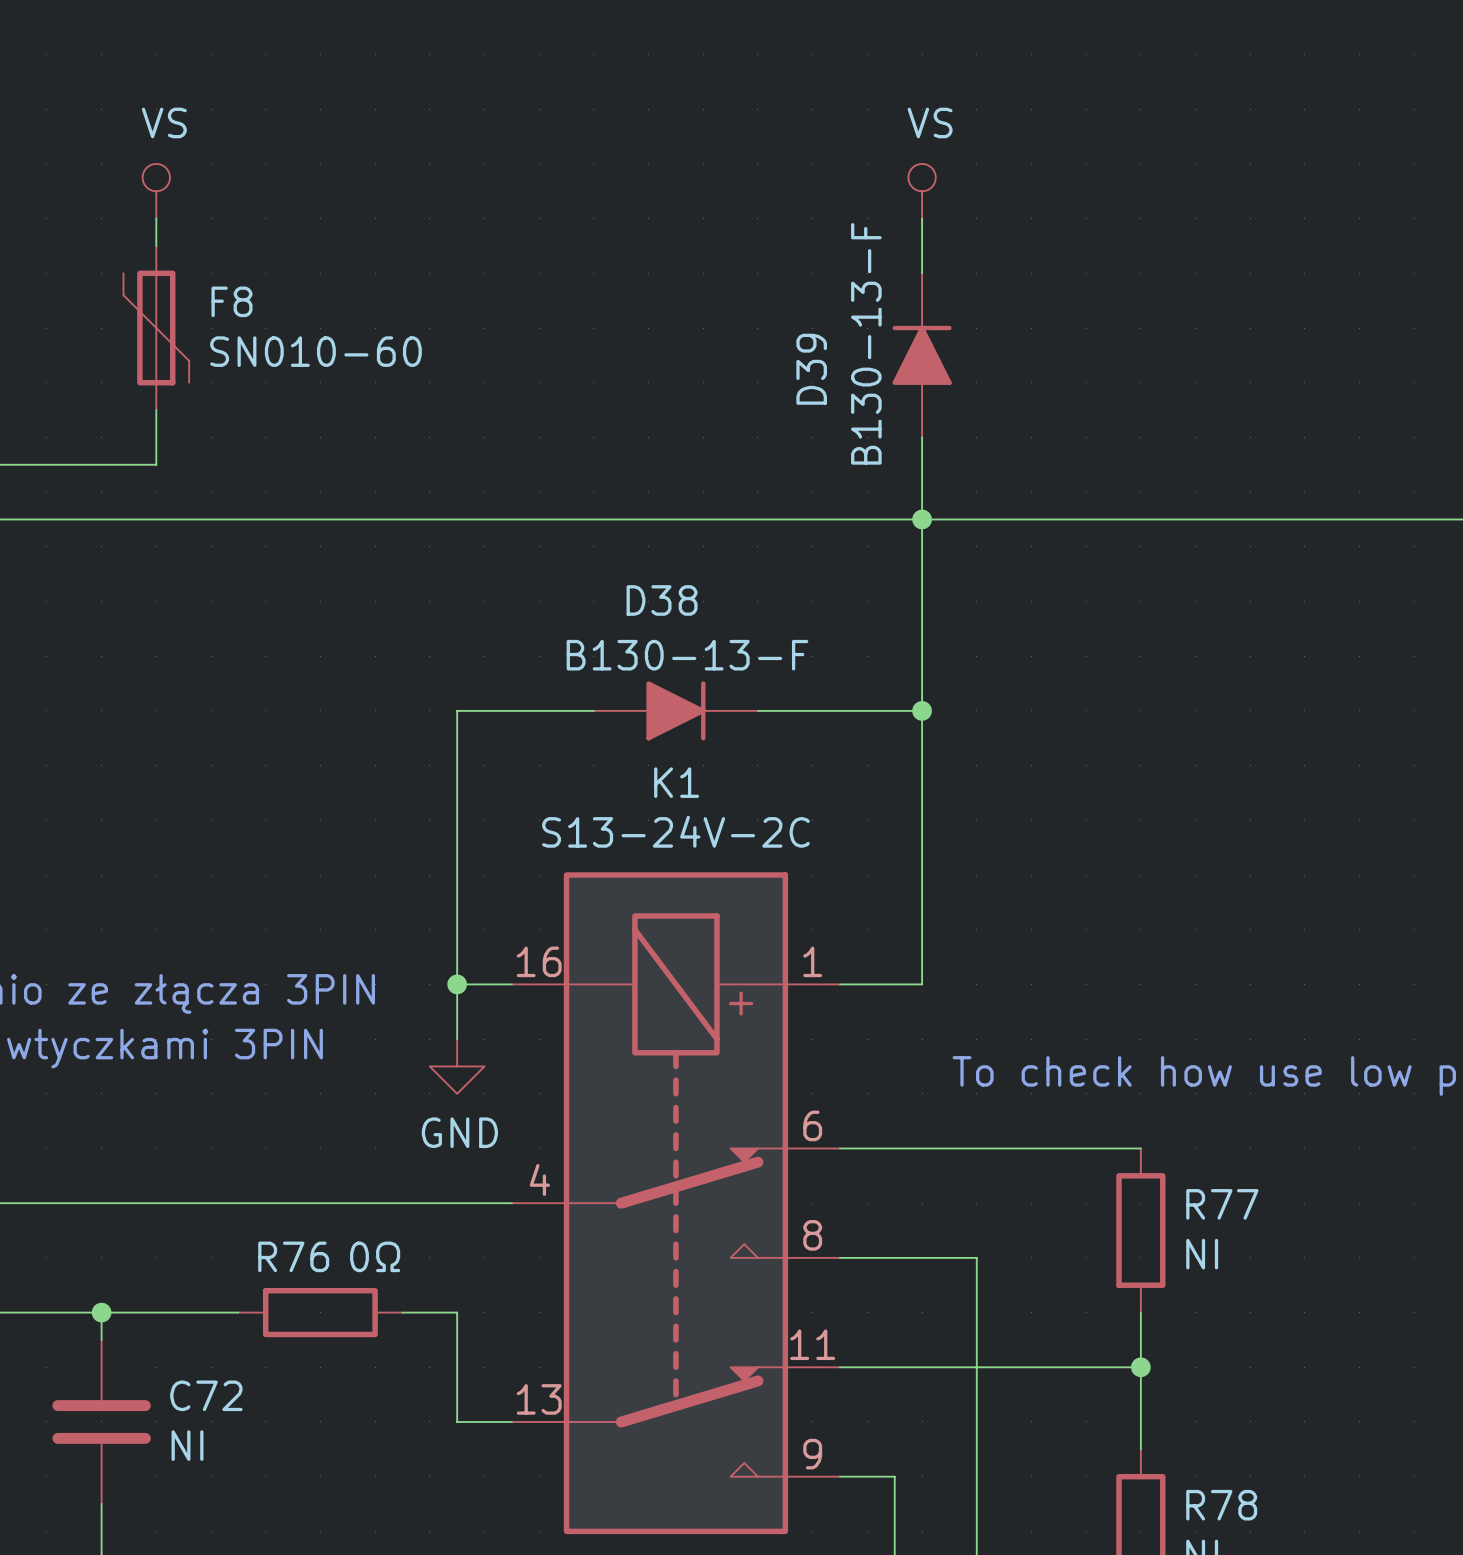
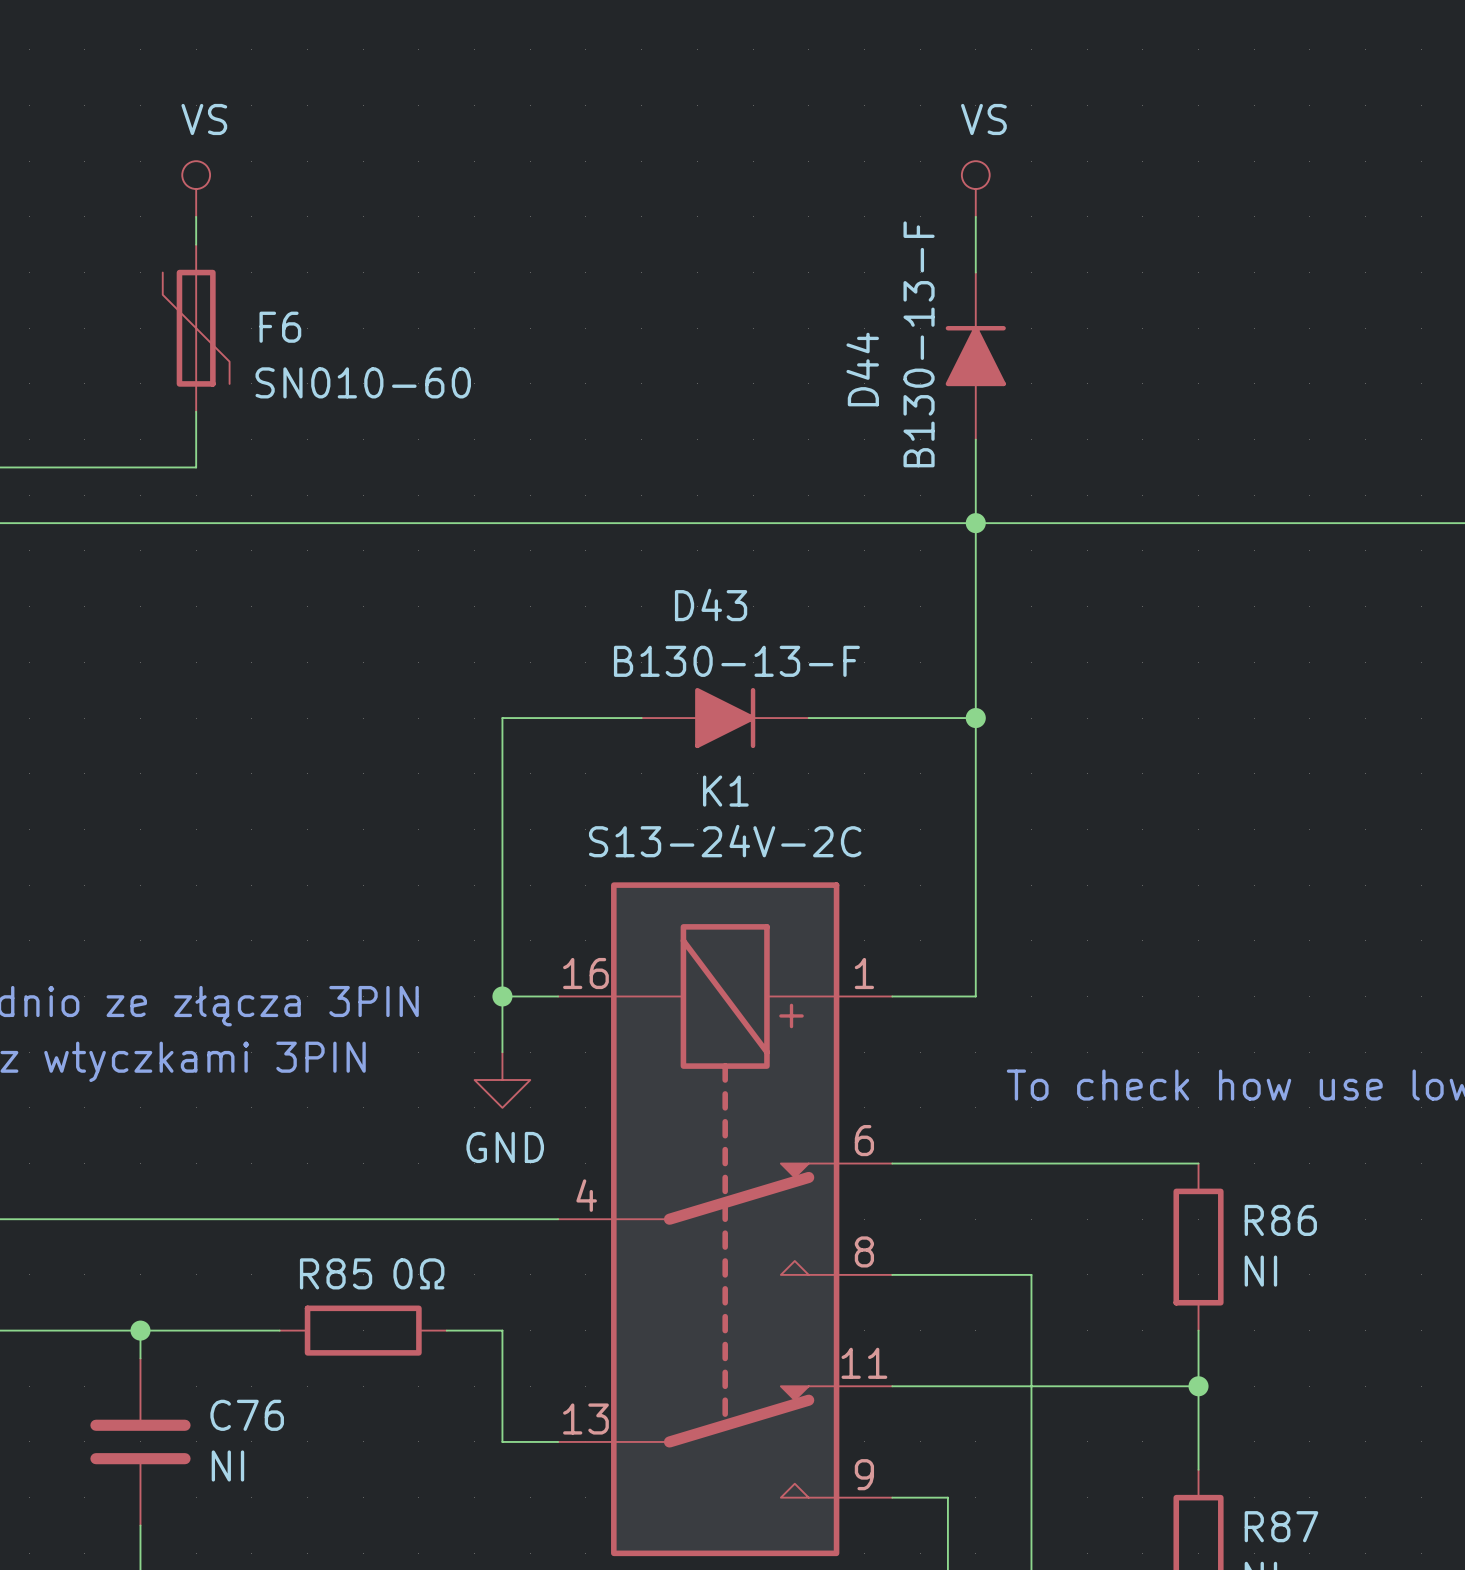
F8 name: F8 (232, 301) -> F6 (280, 327)
F8 value position: SN010-60 (316, 351) -> SN010-60 (363, 382)
D39 name: D39 (811, 369) -> D44 (862, 369)
D38 name: D38 (662, 600) -> D43 (711, 604)
R77 name: R77 (1222, 1204) -> R86 (1280, 1220)
R76 name: R76 (293, 1256) -> R85 (336, 1273)
C72 name: C72 (206, 1395) -> C76 (247, 1415)
R78 name: R78 (1221, 1505) -> R87 (1281, 1526)

